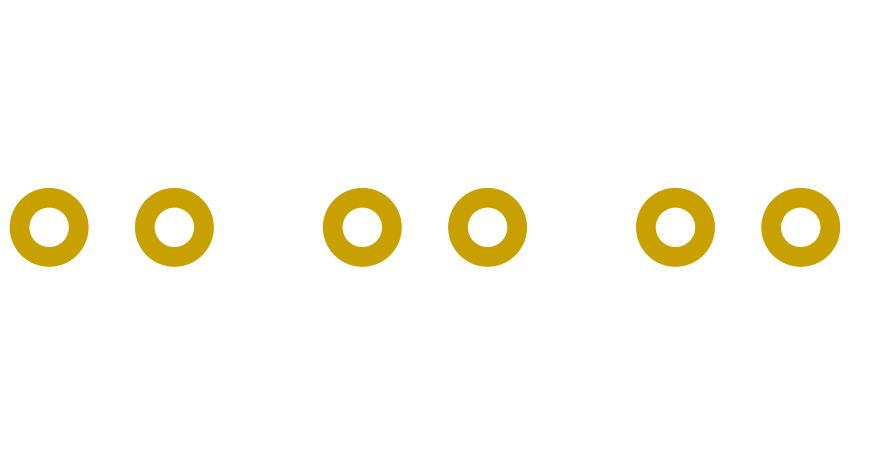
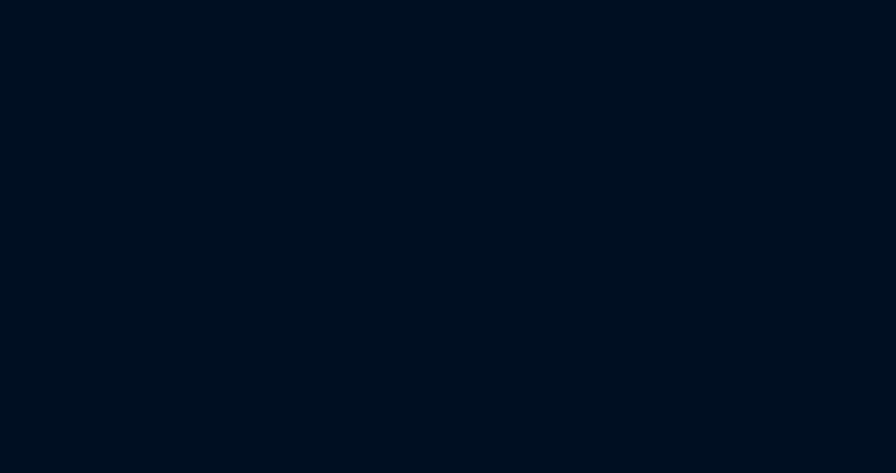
part: (111, 227) -> none
part: (424, 227) -> none
part: (738, 227) -> none

